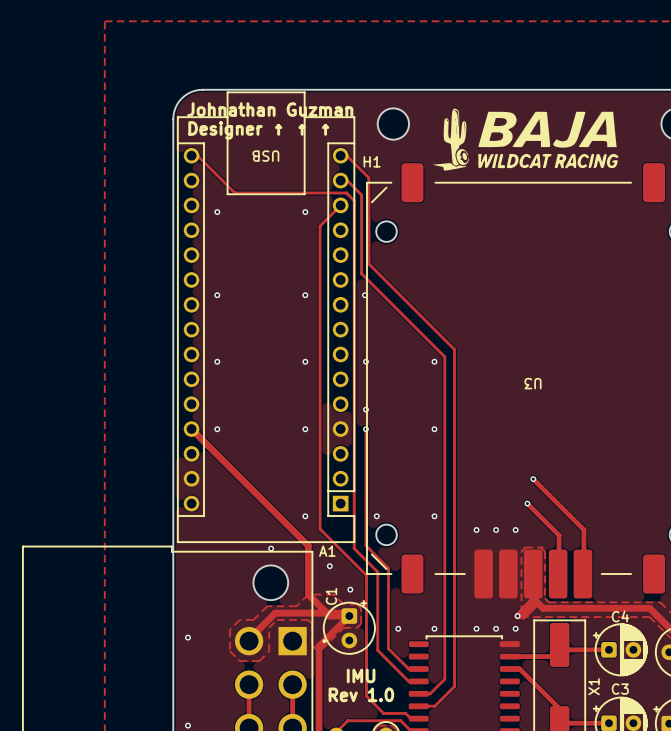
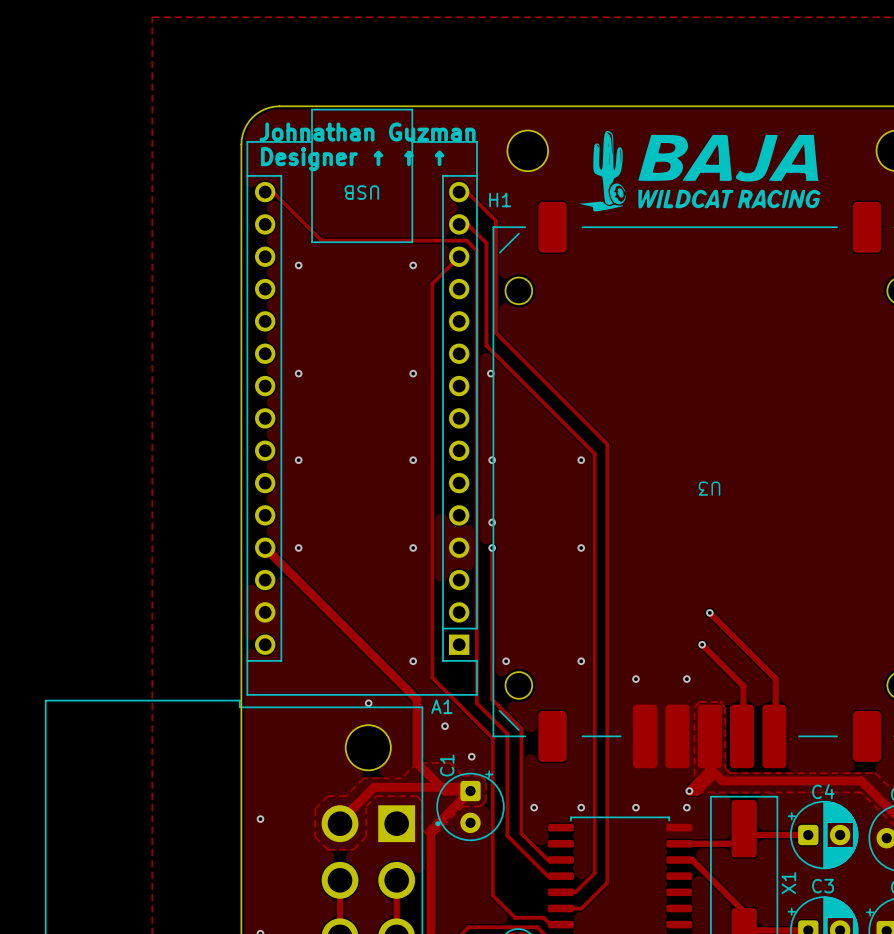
via: (496, 529) -> none
via: (496, 628) -> none
text: IMU (361, 675) -> none
text: Rev 1.0 (361, 694) -> none

